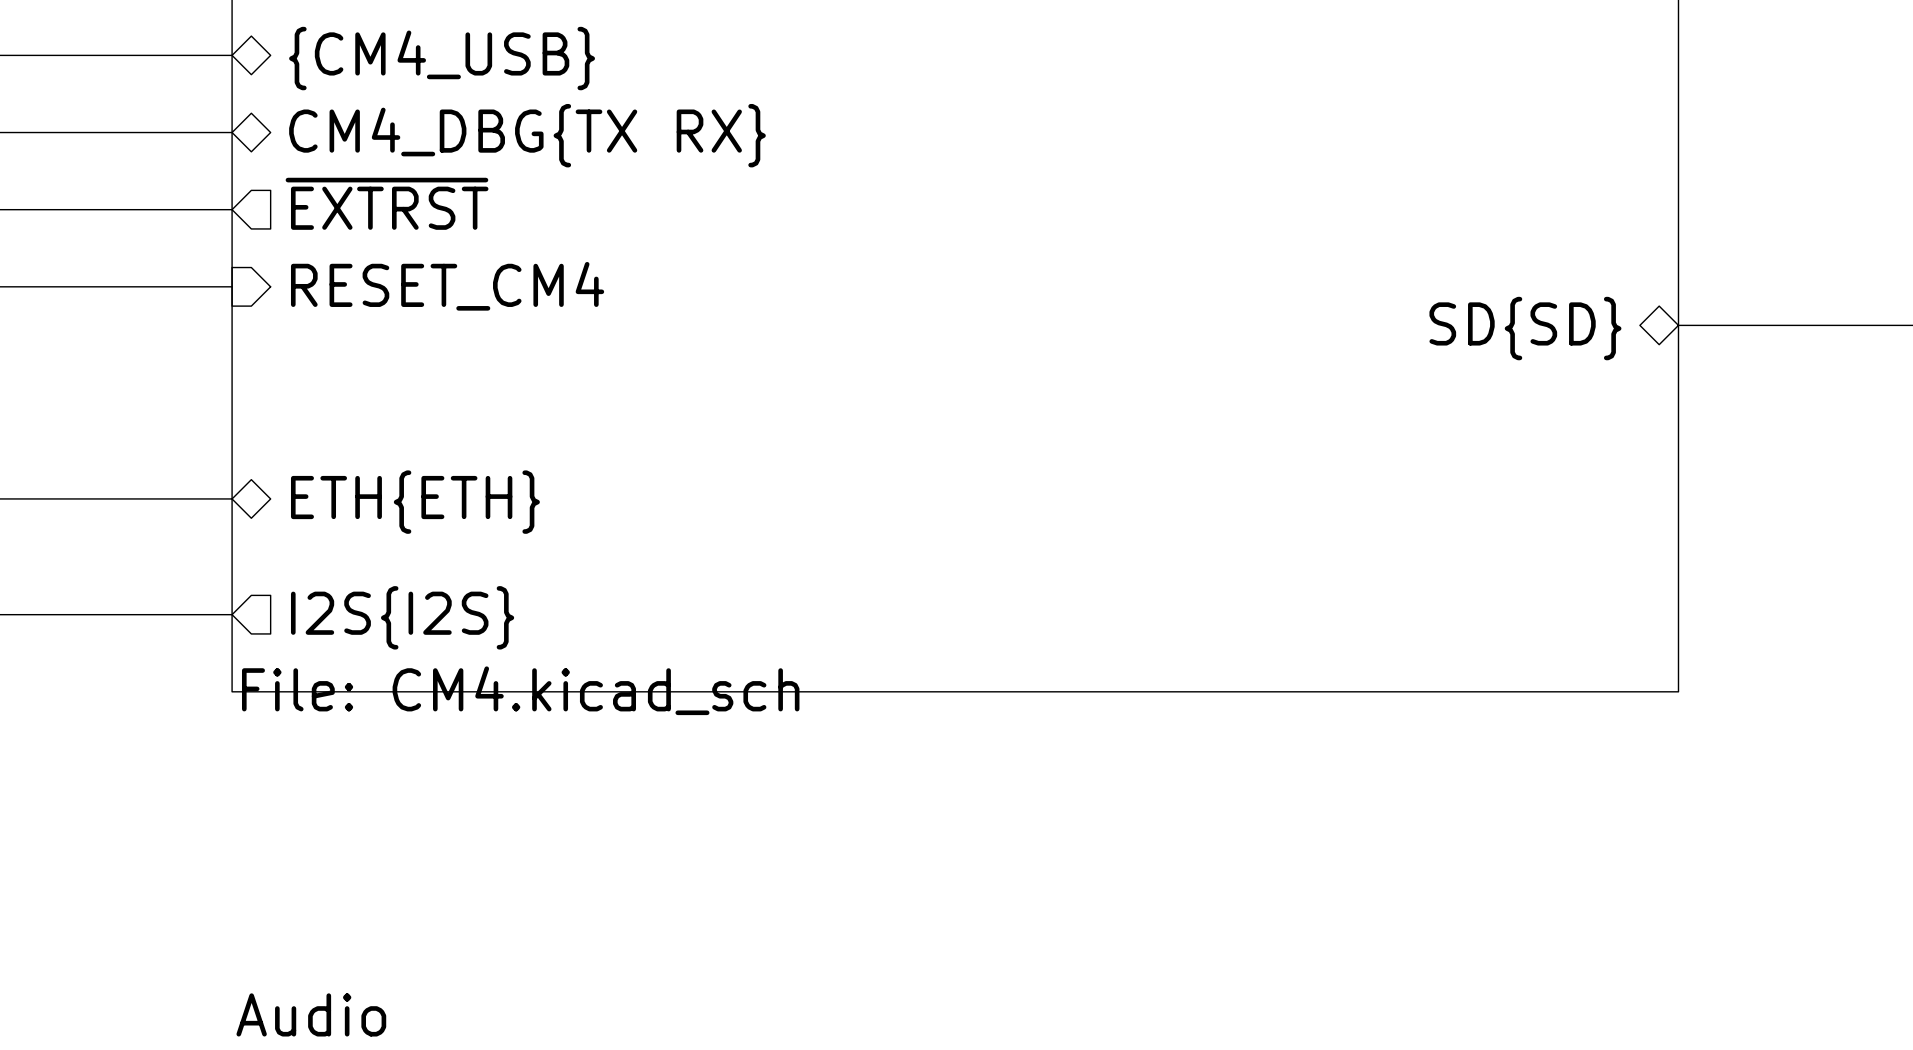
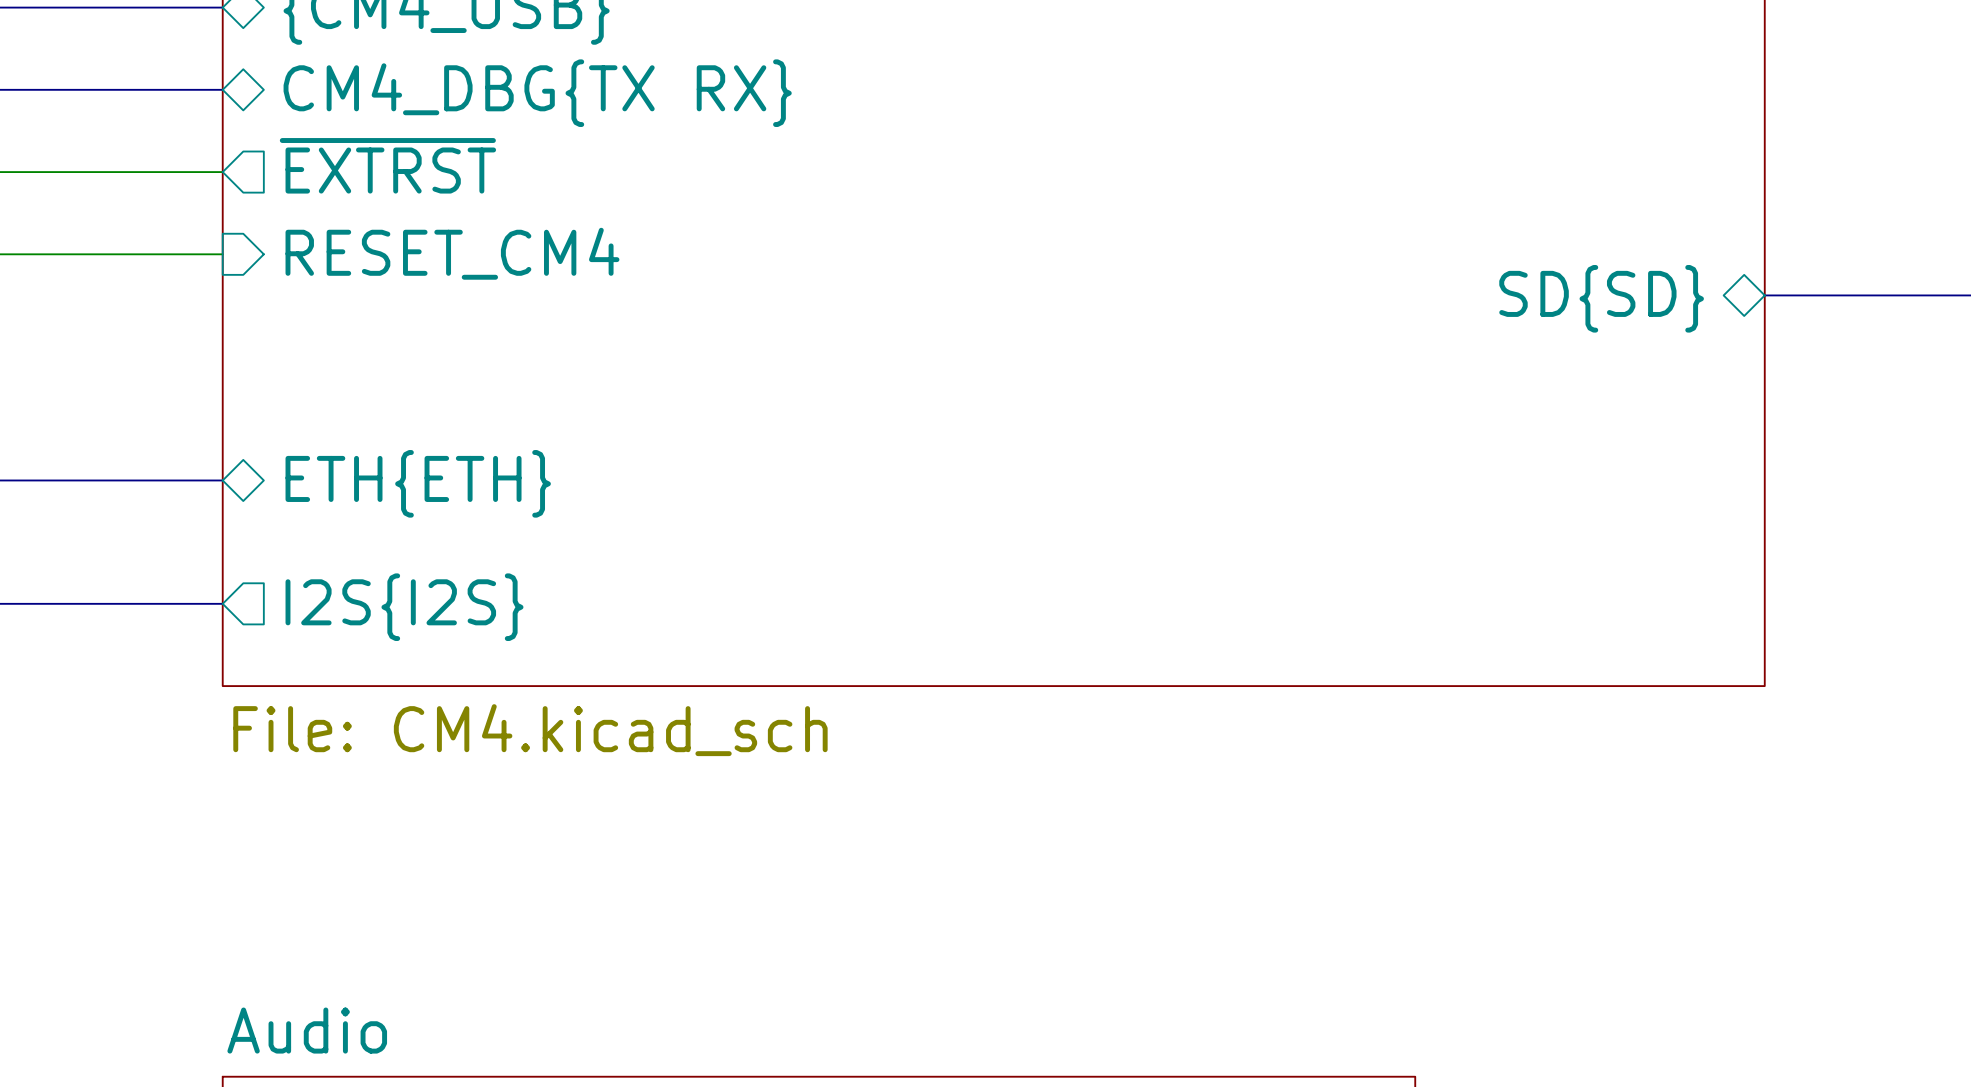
sheet value position: File: CM4.kicad_sch (520, 690) -> File: CM4.kicad_sch (530, 730)

